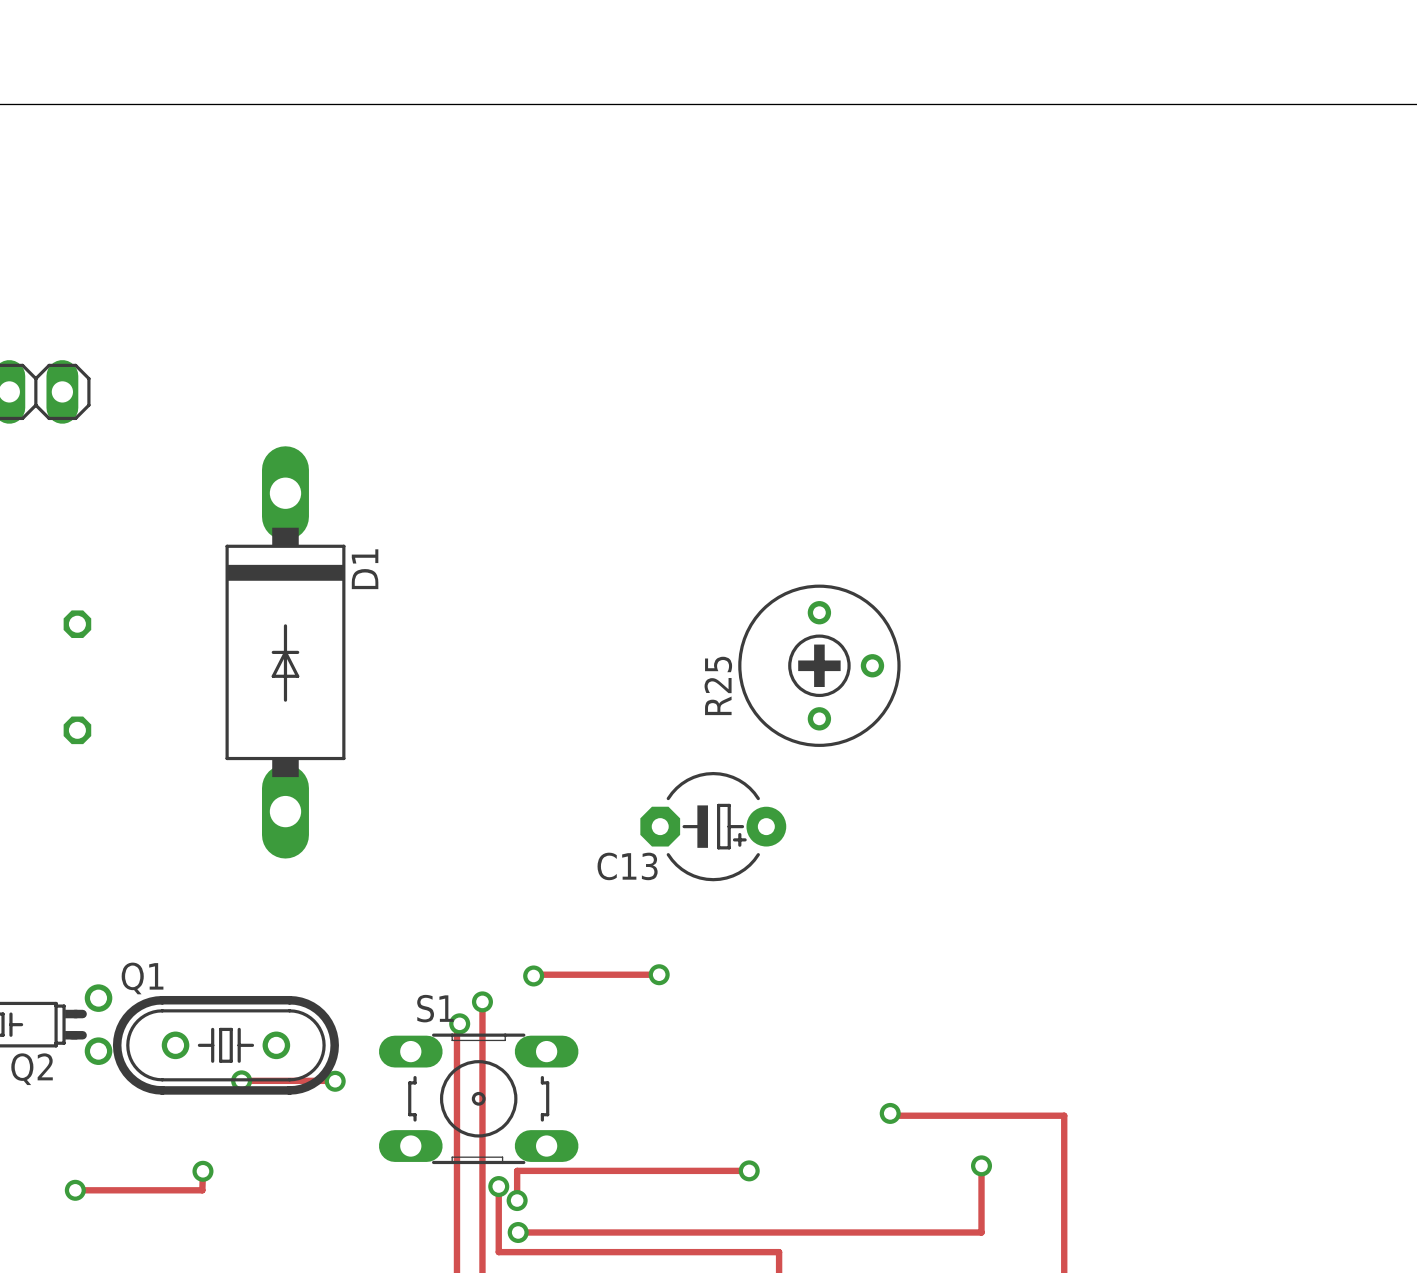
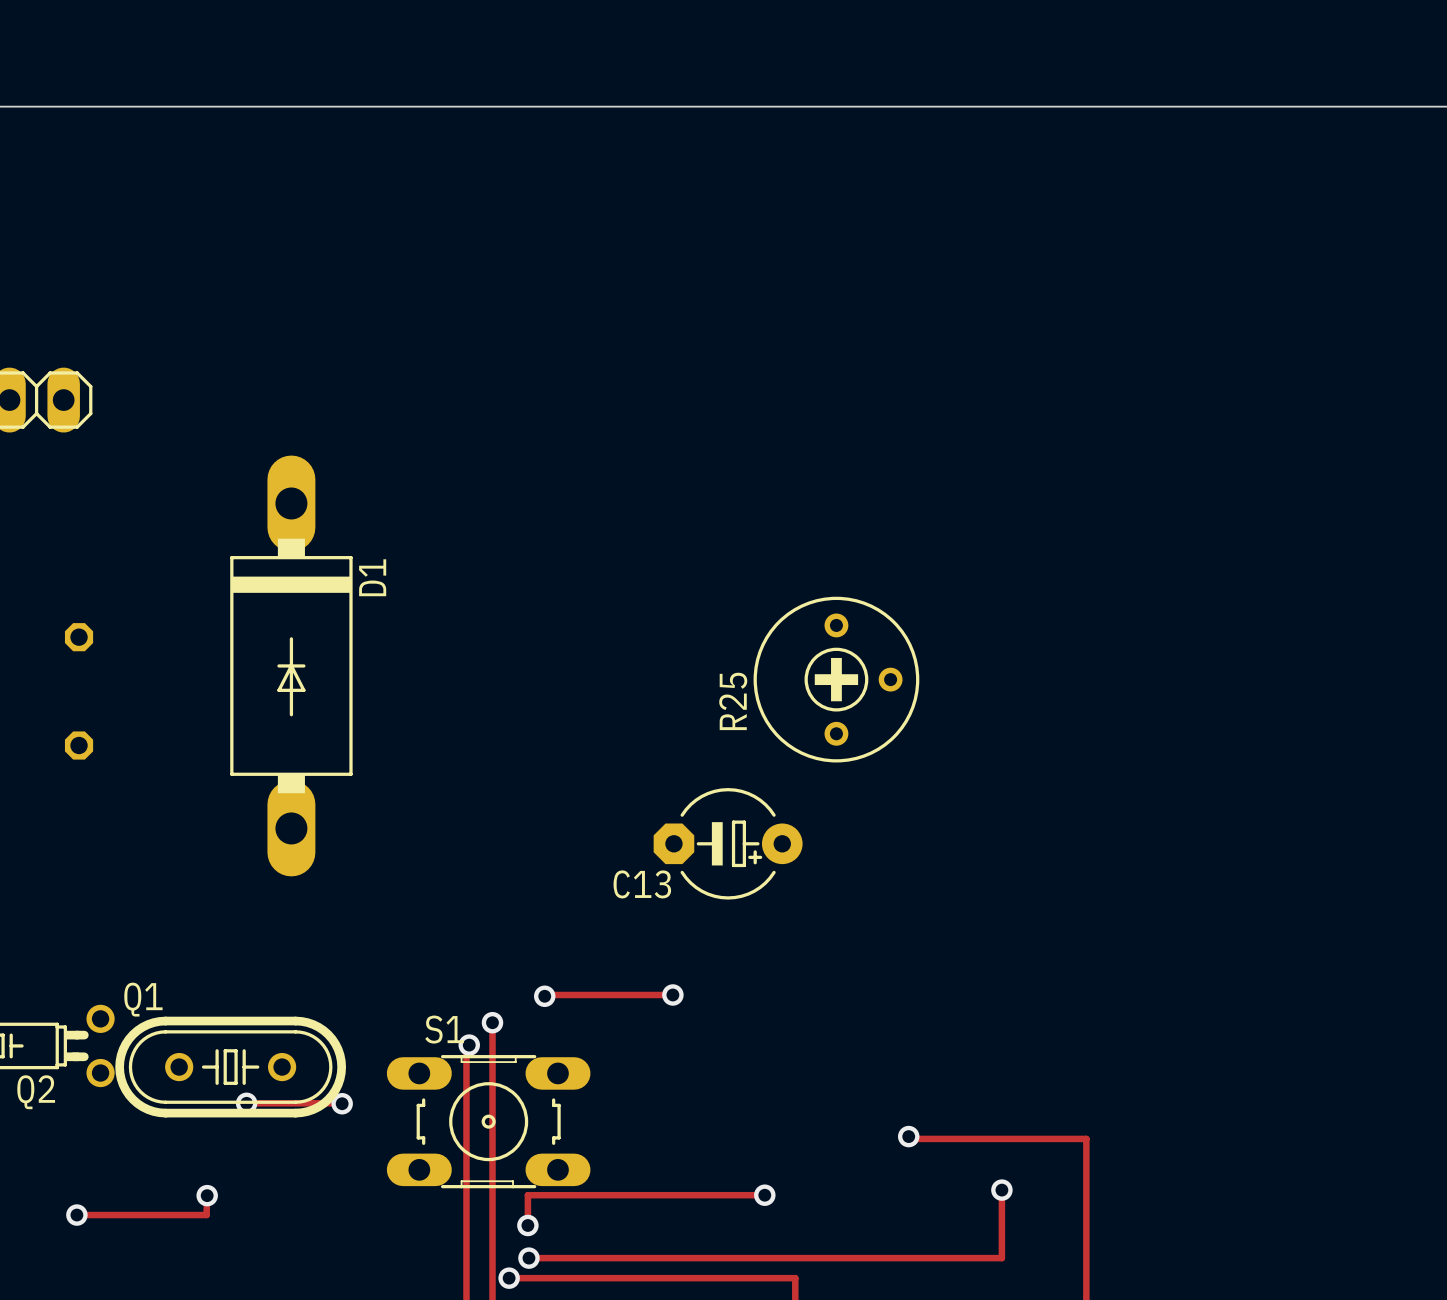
track: (498, 1186) (498, 1252) -> none
via position: (498, 1186) -> (509, 1278)

